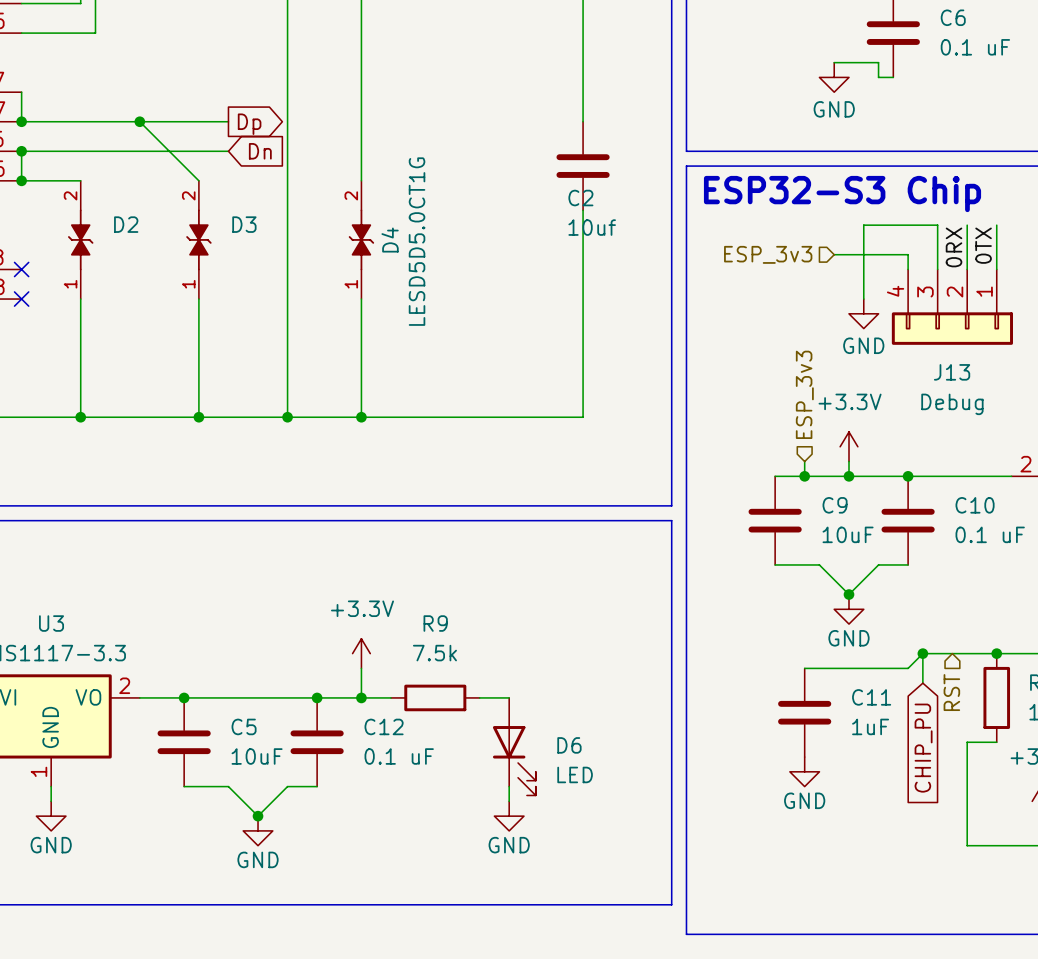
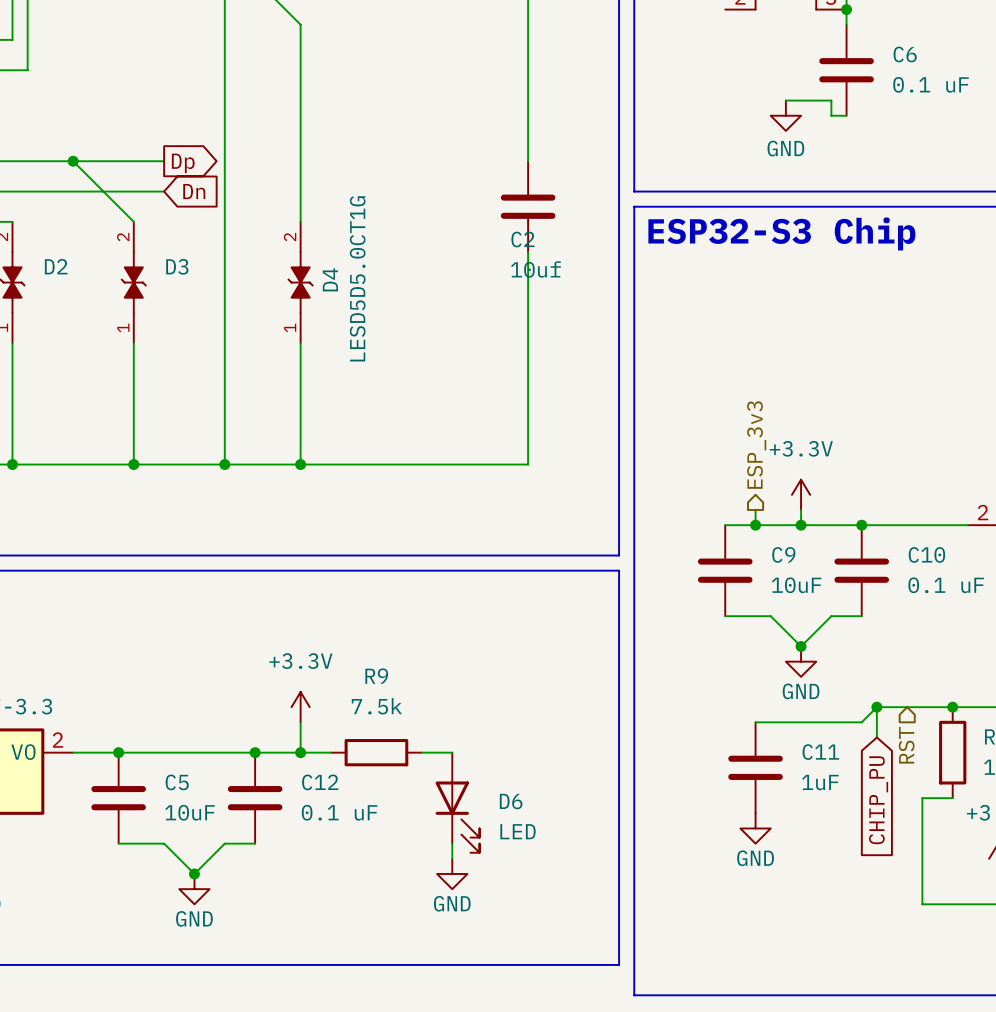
wire: (967, 225) (967, 269) -> none
wire: (996, 225) (996, 269) -> none
label: 0TX (983, 245) -> none
label: 0RX (954, 247) -> none
hierarchical label: ESP_3v3 (768, 254) -> none
wire: (834, 254) (908, 254) (908, 269) -> none
wire: (937, 269) (937, 225) (863, 225) (863, 299) -> none
J13: Debug (952, 307) -> none
power symbol: GND (863, 313) -> none
hierarchical label shape: input (804, 394) -> output (756, 445)

